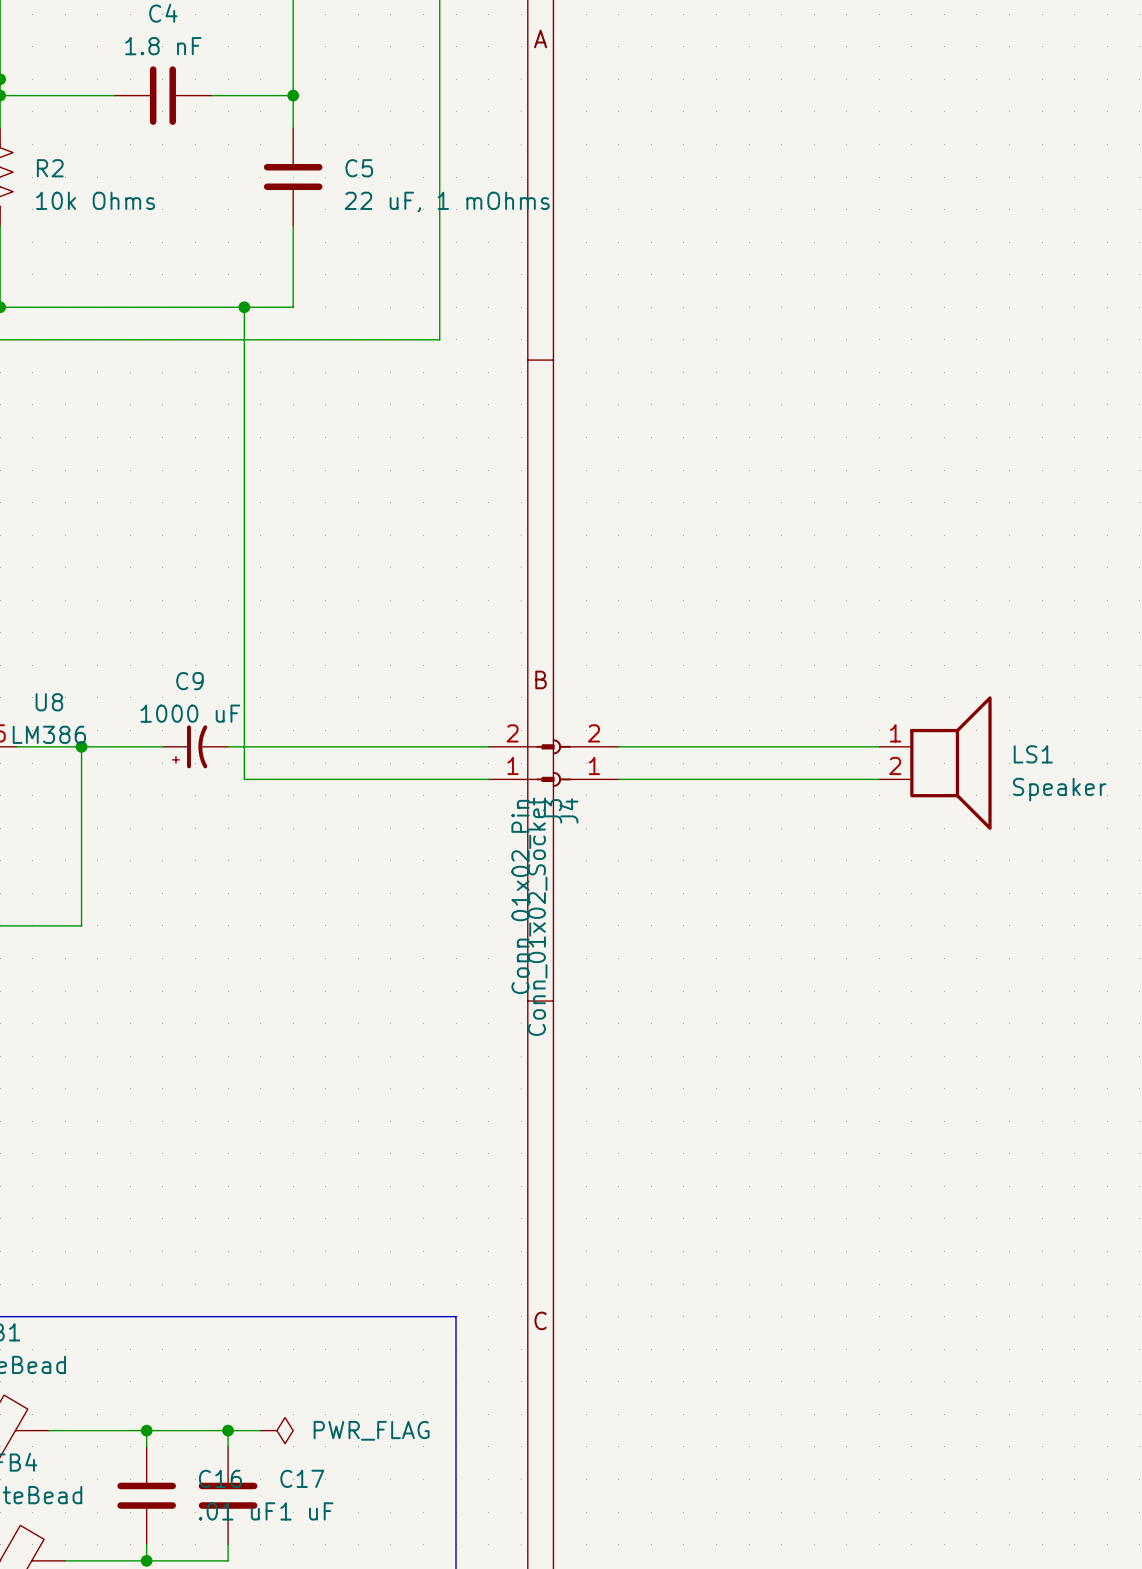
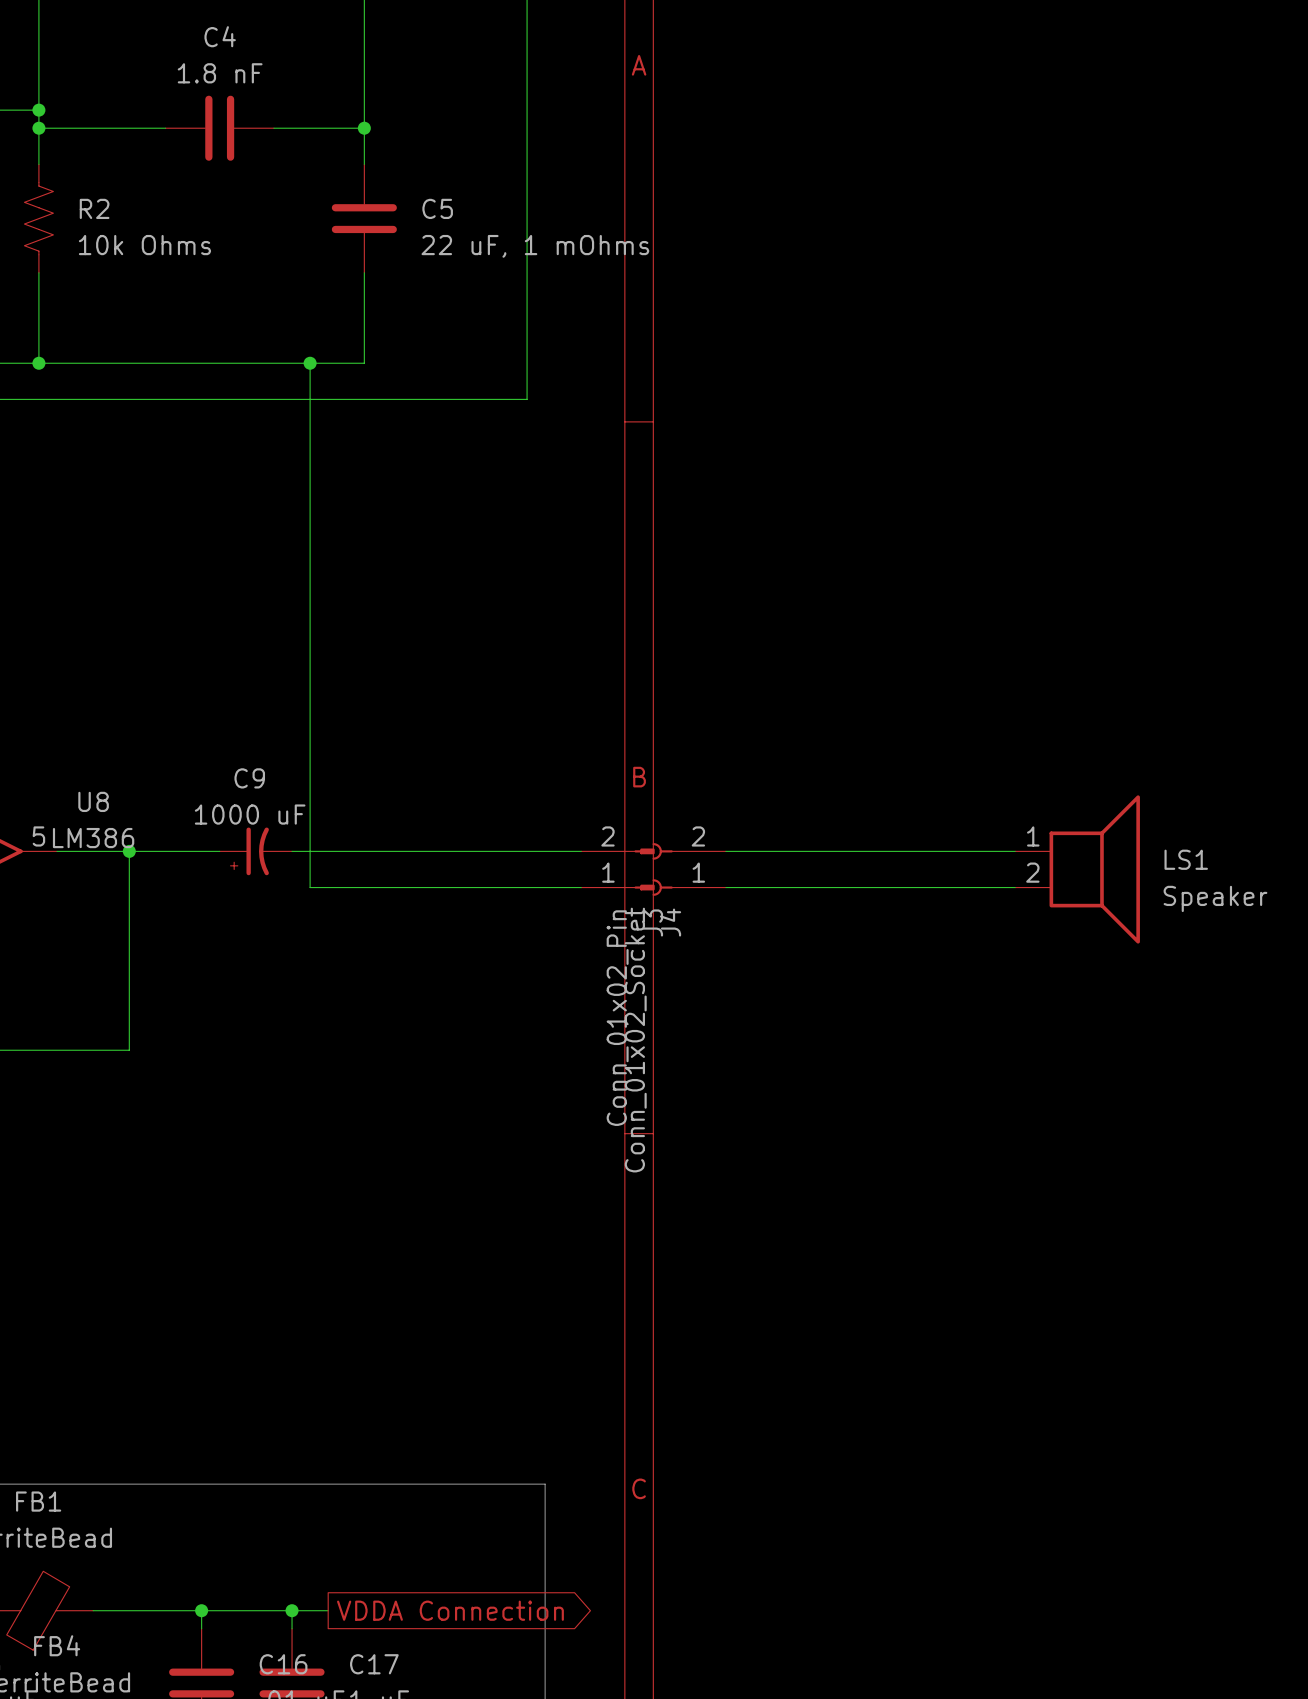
power symbol: PWR_FLAG (276, 1430) -> none
global label: none -> VDDA Connection (450, 1610)

